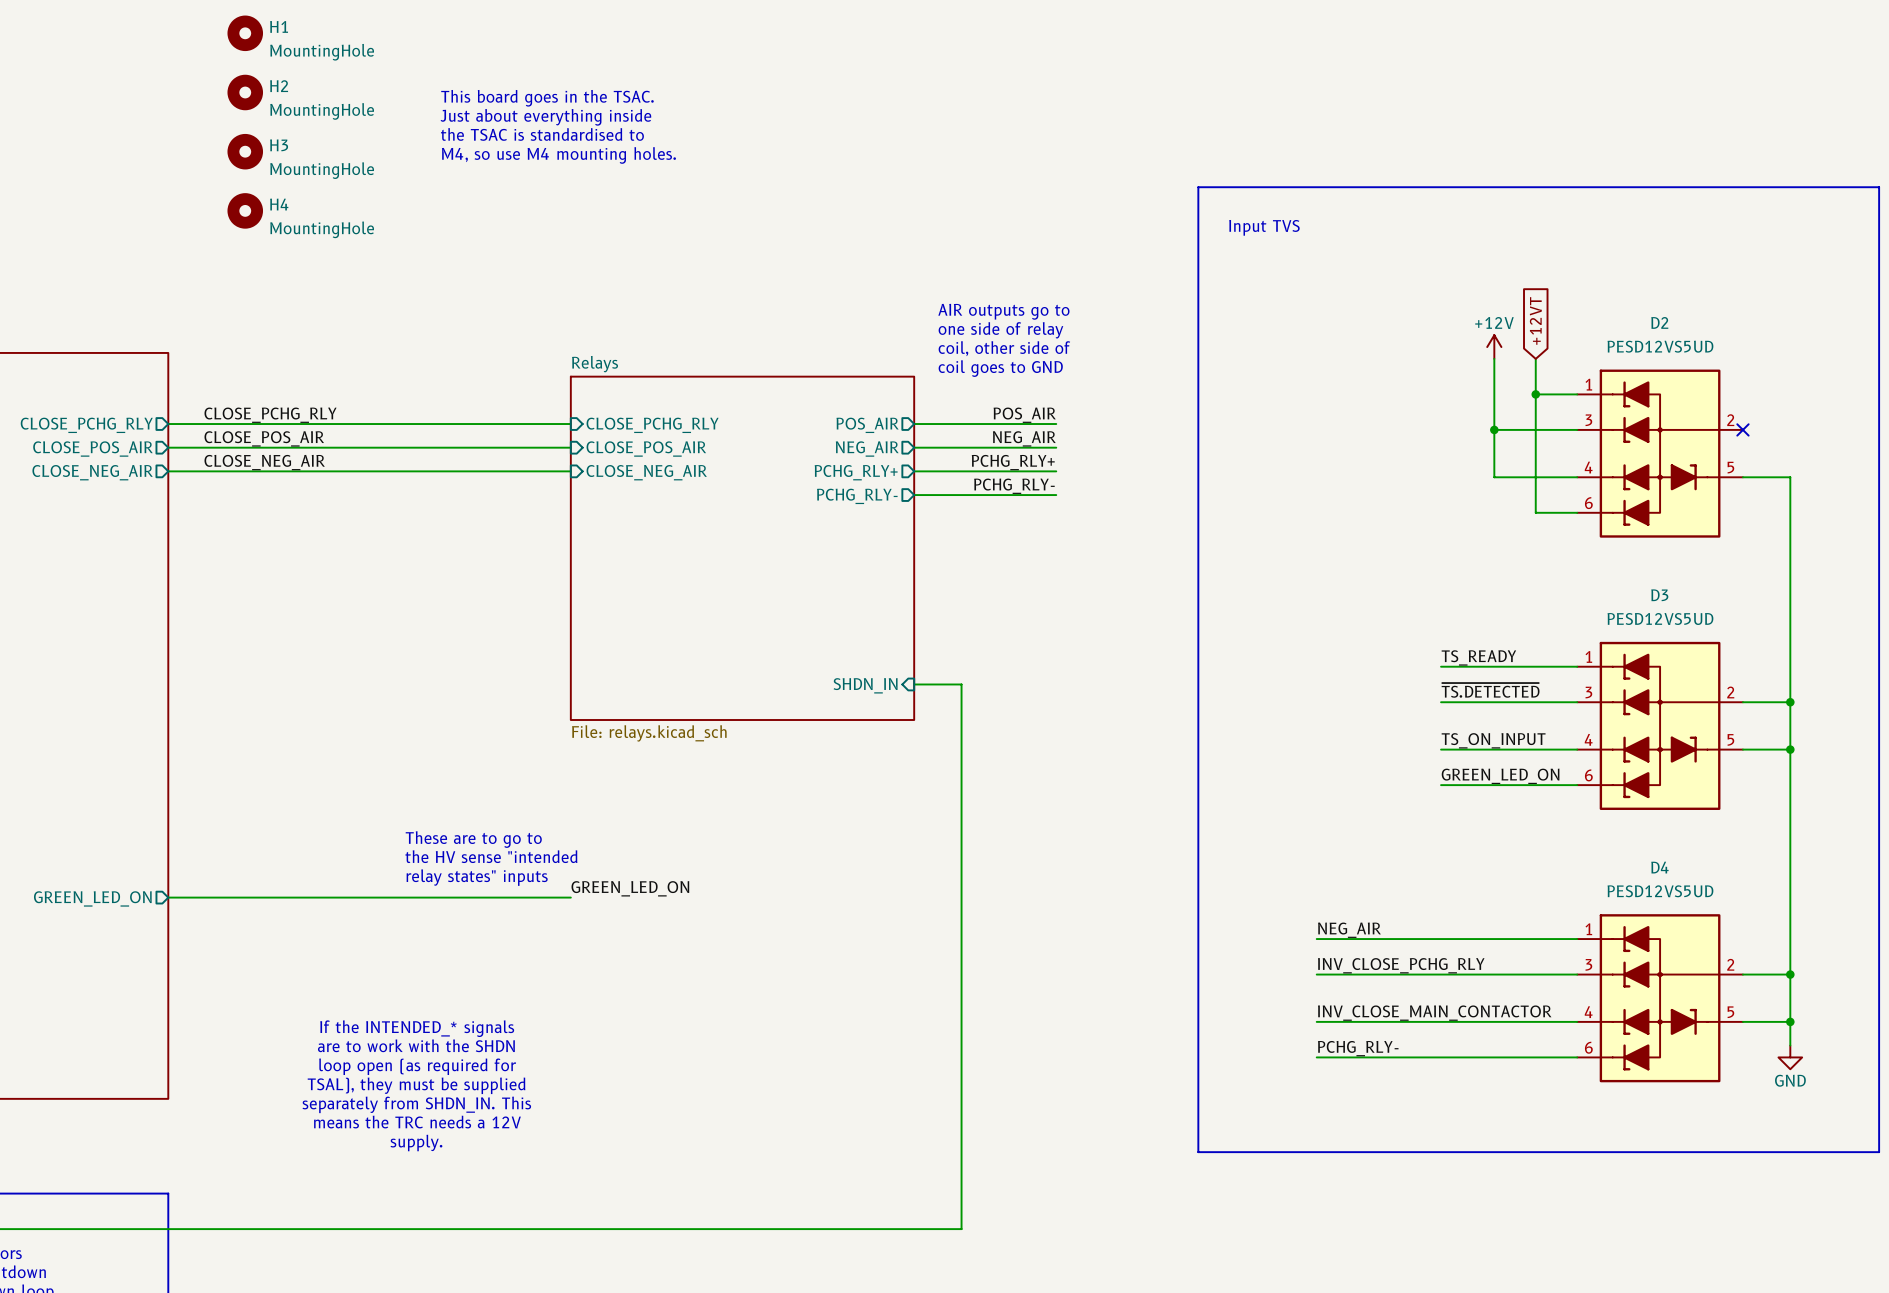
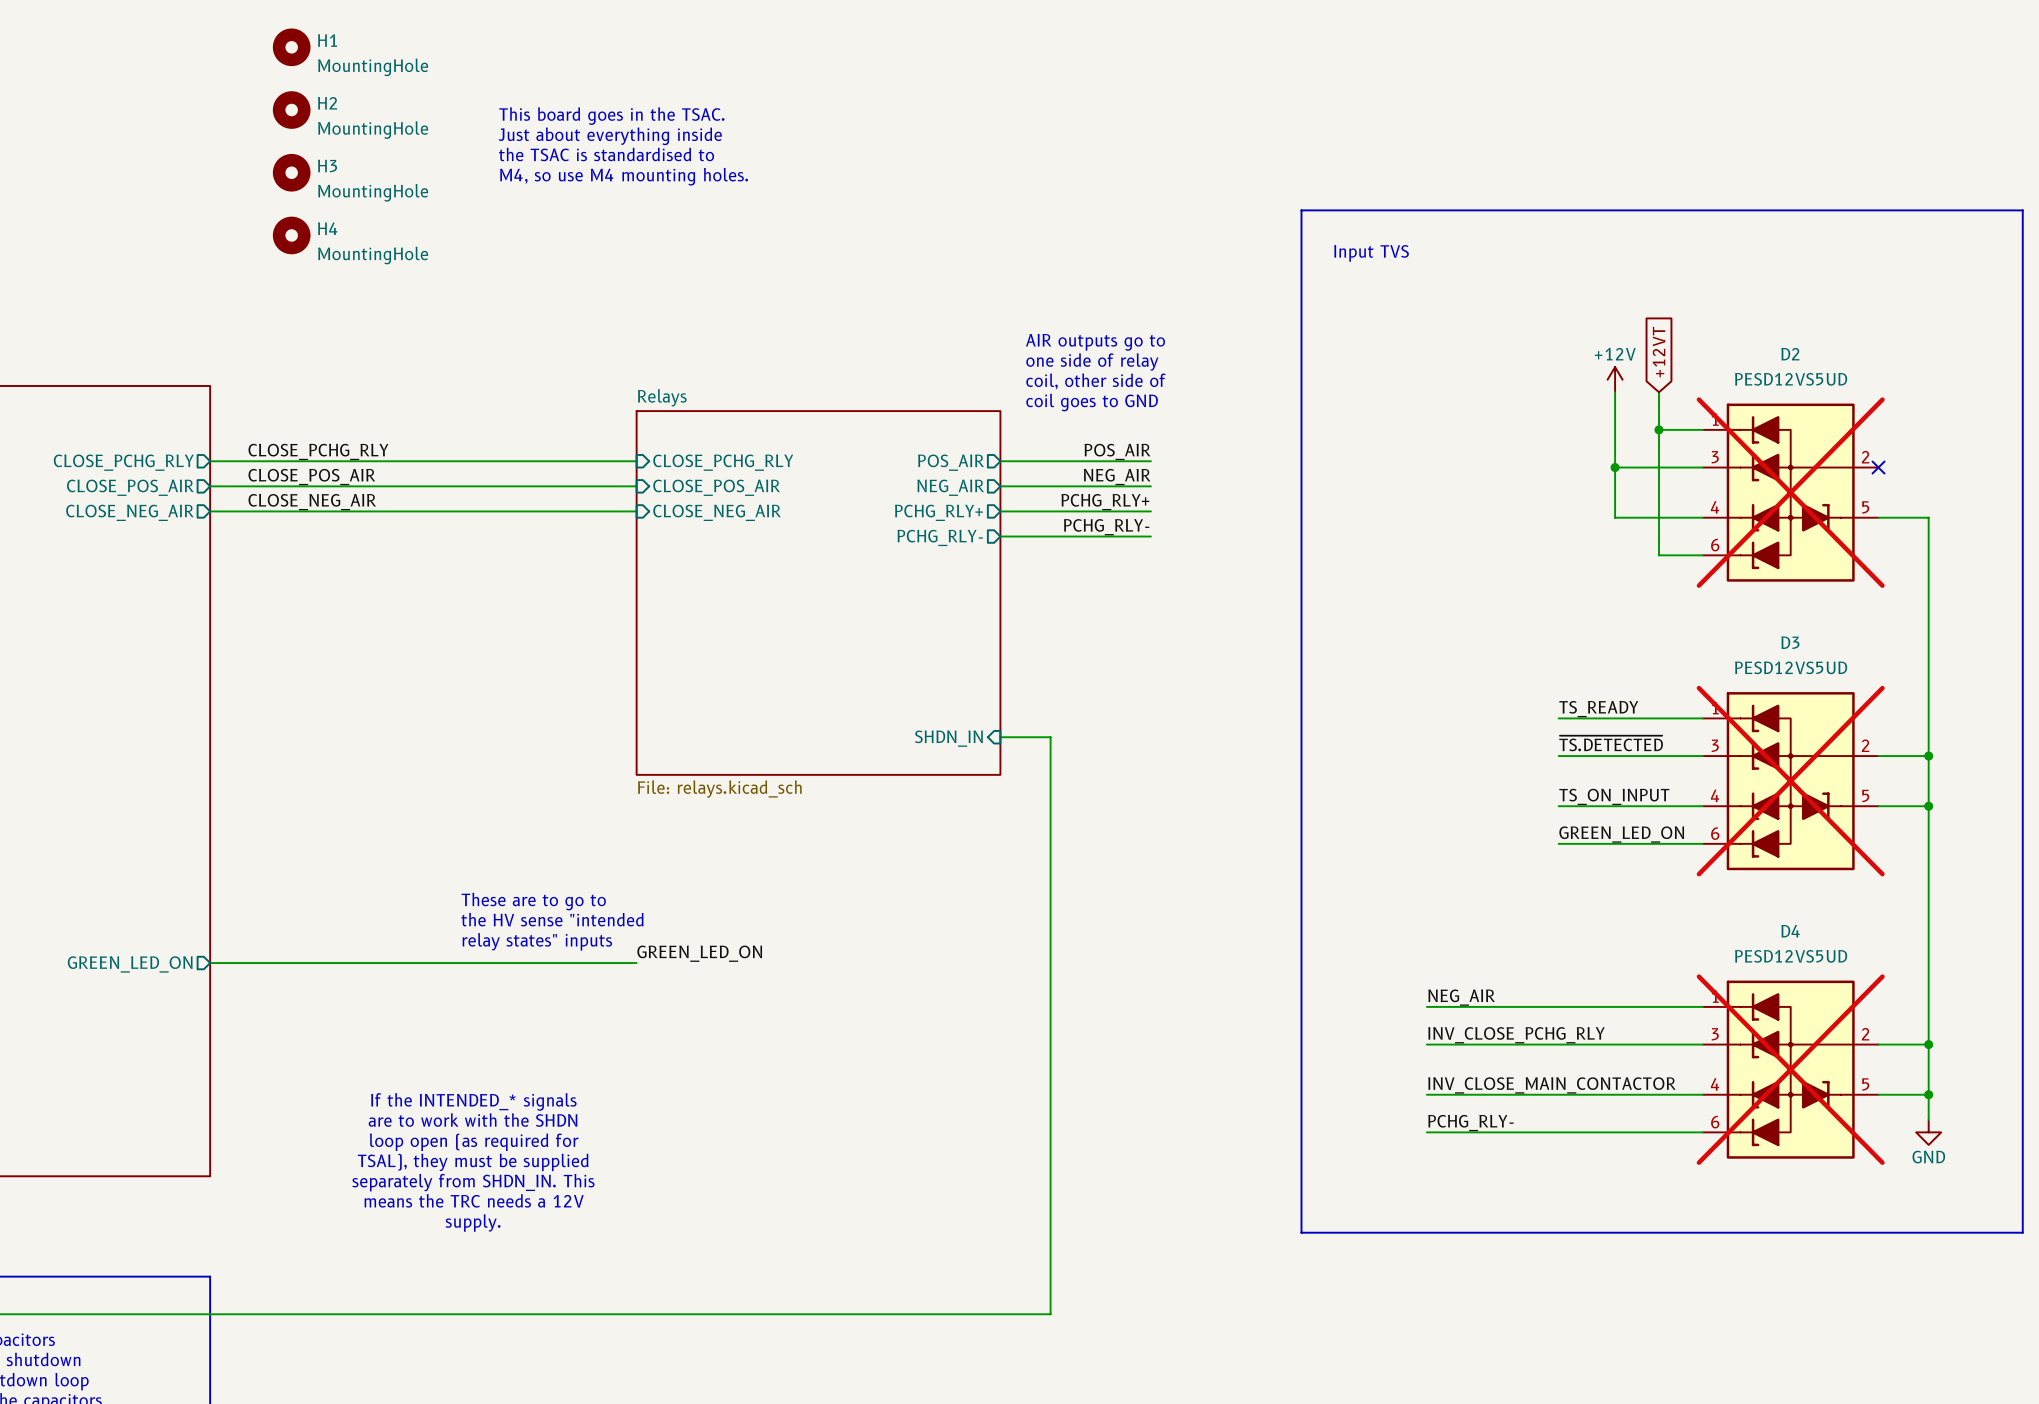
D2 do-not-place cross: none -> (1790, 492)
D3 do-not-place cross: none -> (1790, 781)
D4 do-not-place cross: none -> (1790, 1069)

